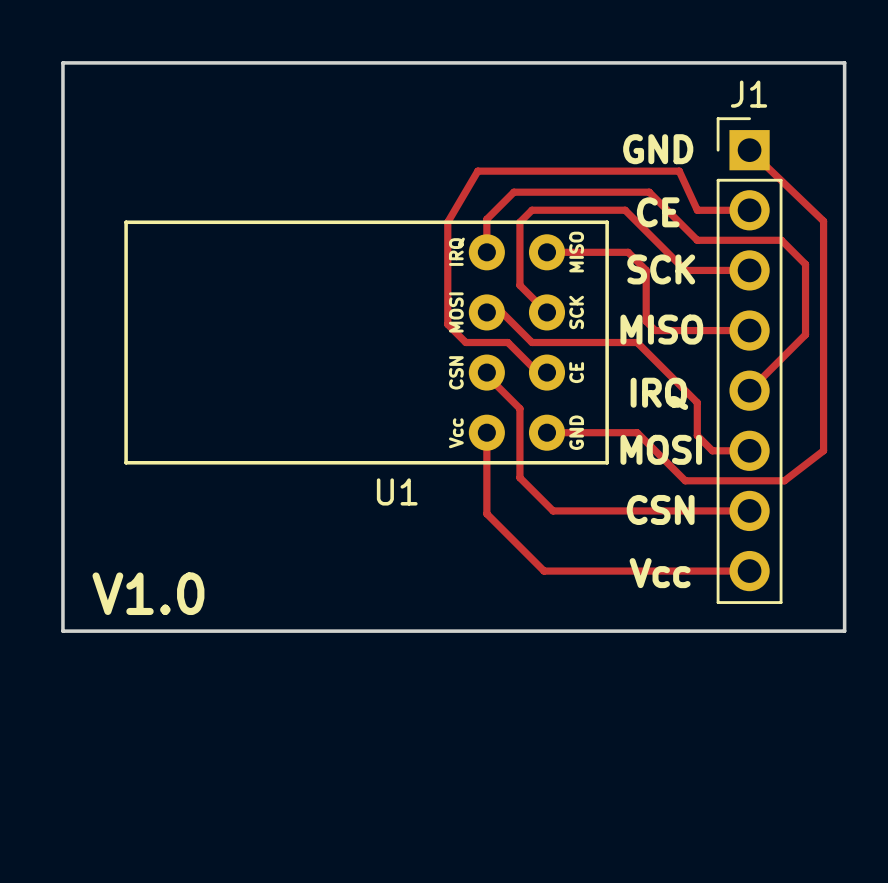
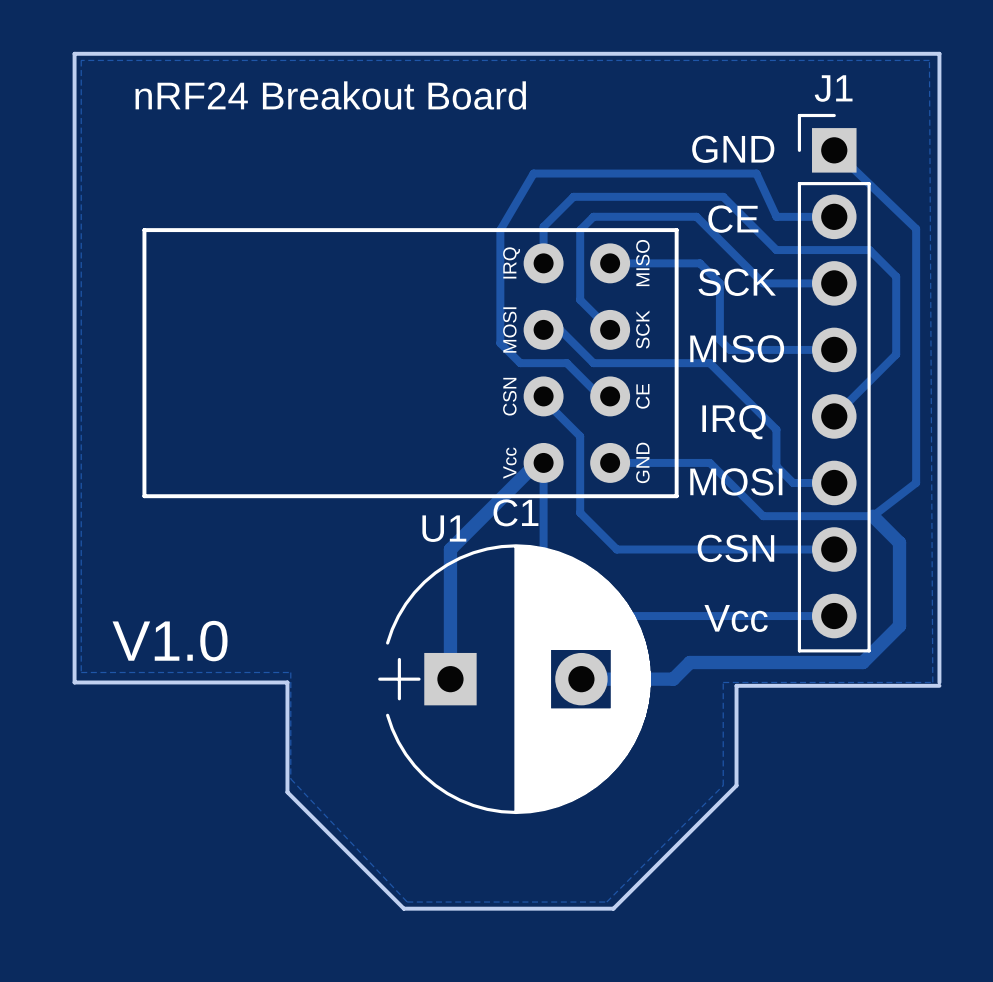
zone outline: none -> (81, 60) (929, 60) (932, 682) (723, 682) (723, 785) (606, 902) (407, 902) (290, 778) (290, 672) (81, 672) (81, 60)
text: none -> nRF24 Breakout Board (330, 95)
track: none -> (543, 462) (536, 462) (450, 549) (450, 679)
track: none -> (872, 516) (899, 542) (899, 625) (862, 662) (689, 662) (673, 679) (581, 679)
C1: none -> (514, 679)
board edge: (255, 631) (844, 631) -> (287, 682) (287, 792) (403, 908) (613, 908) (736, 785) (736, 685) (939, 685)

